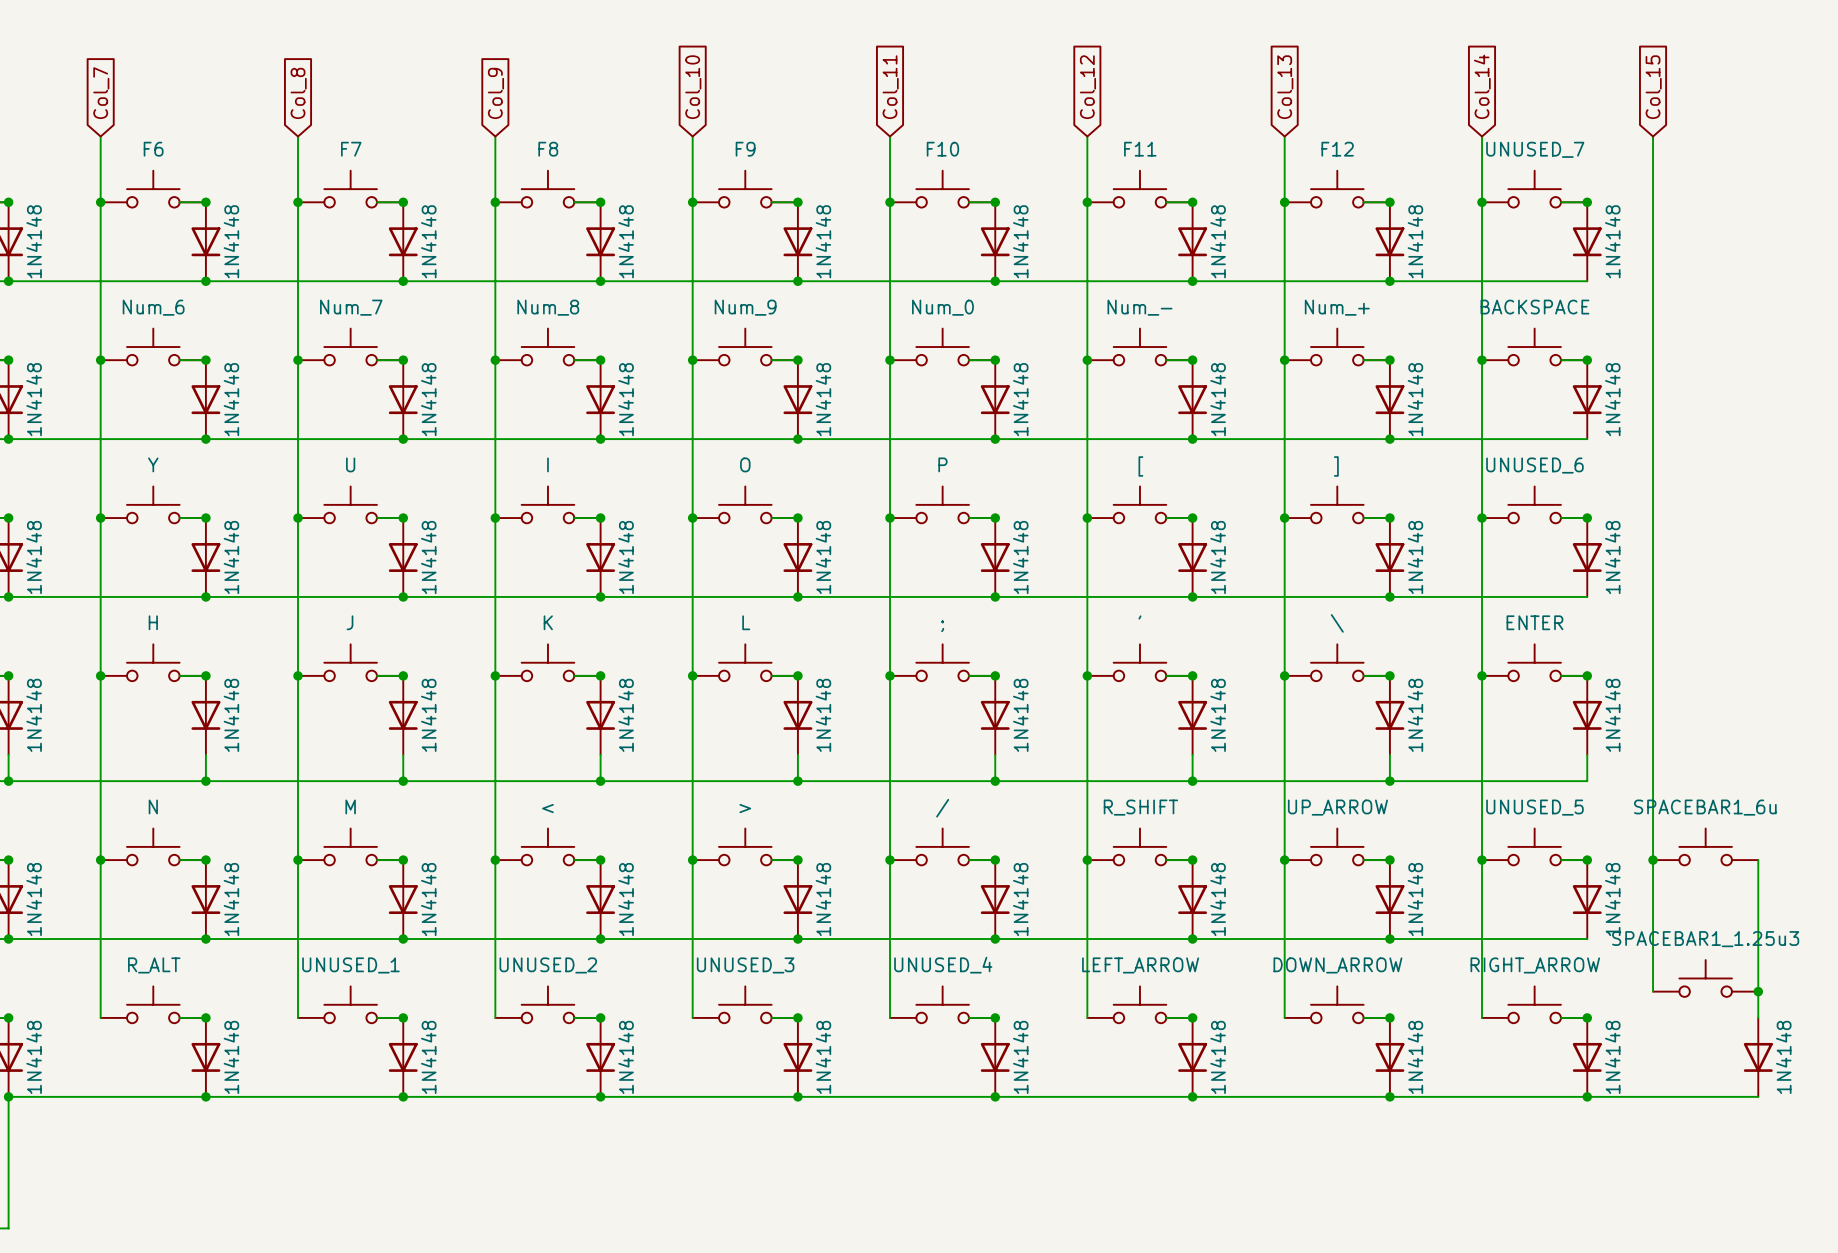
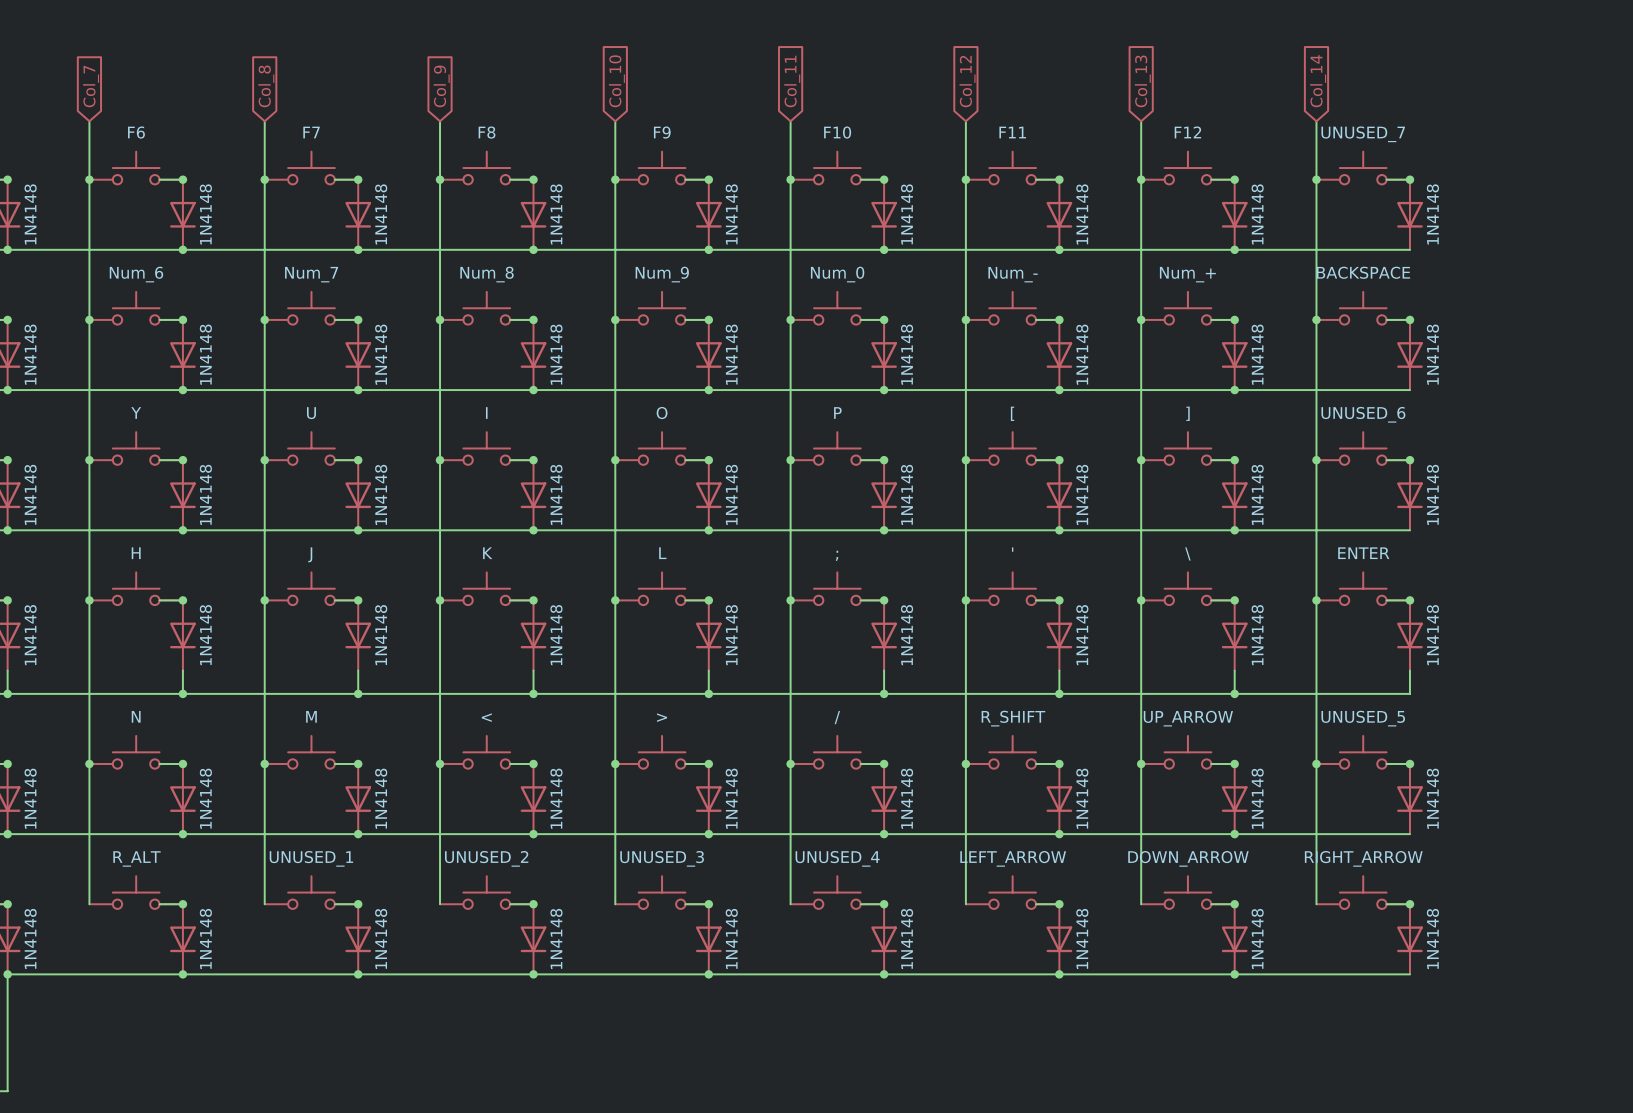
global label: Col_15 (1653, 87) -> none
wire: (1653, 136) (1653, 991) -> none
part: SPACEBAR1_6u (1705, 846) -> none
junction: (1653, 860) -> none
wire: (1758, 860) (1758, 1017) -> none
part: SPACEBAR1_1.25u3 (1705, 978) -> none
junction: (1758, 991) -> none
part: 1N4148 (1758, 1057) -> none
wire: (1587, 1096) (1758, 1096) -> none
junction: (1587, 1096) -> none

